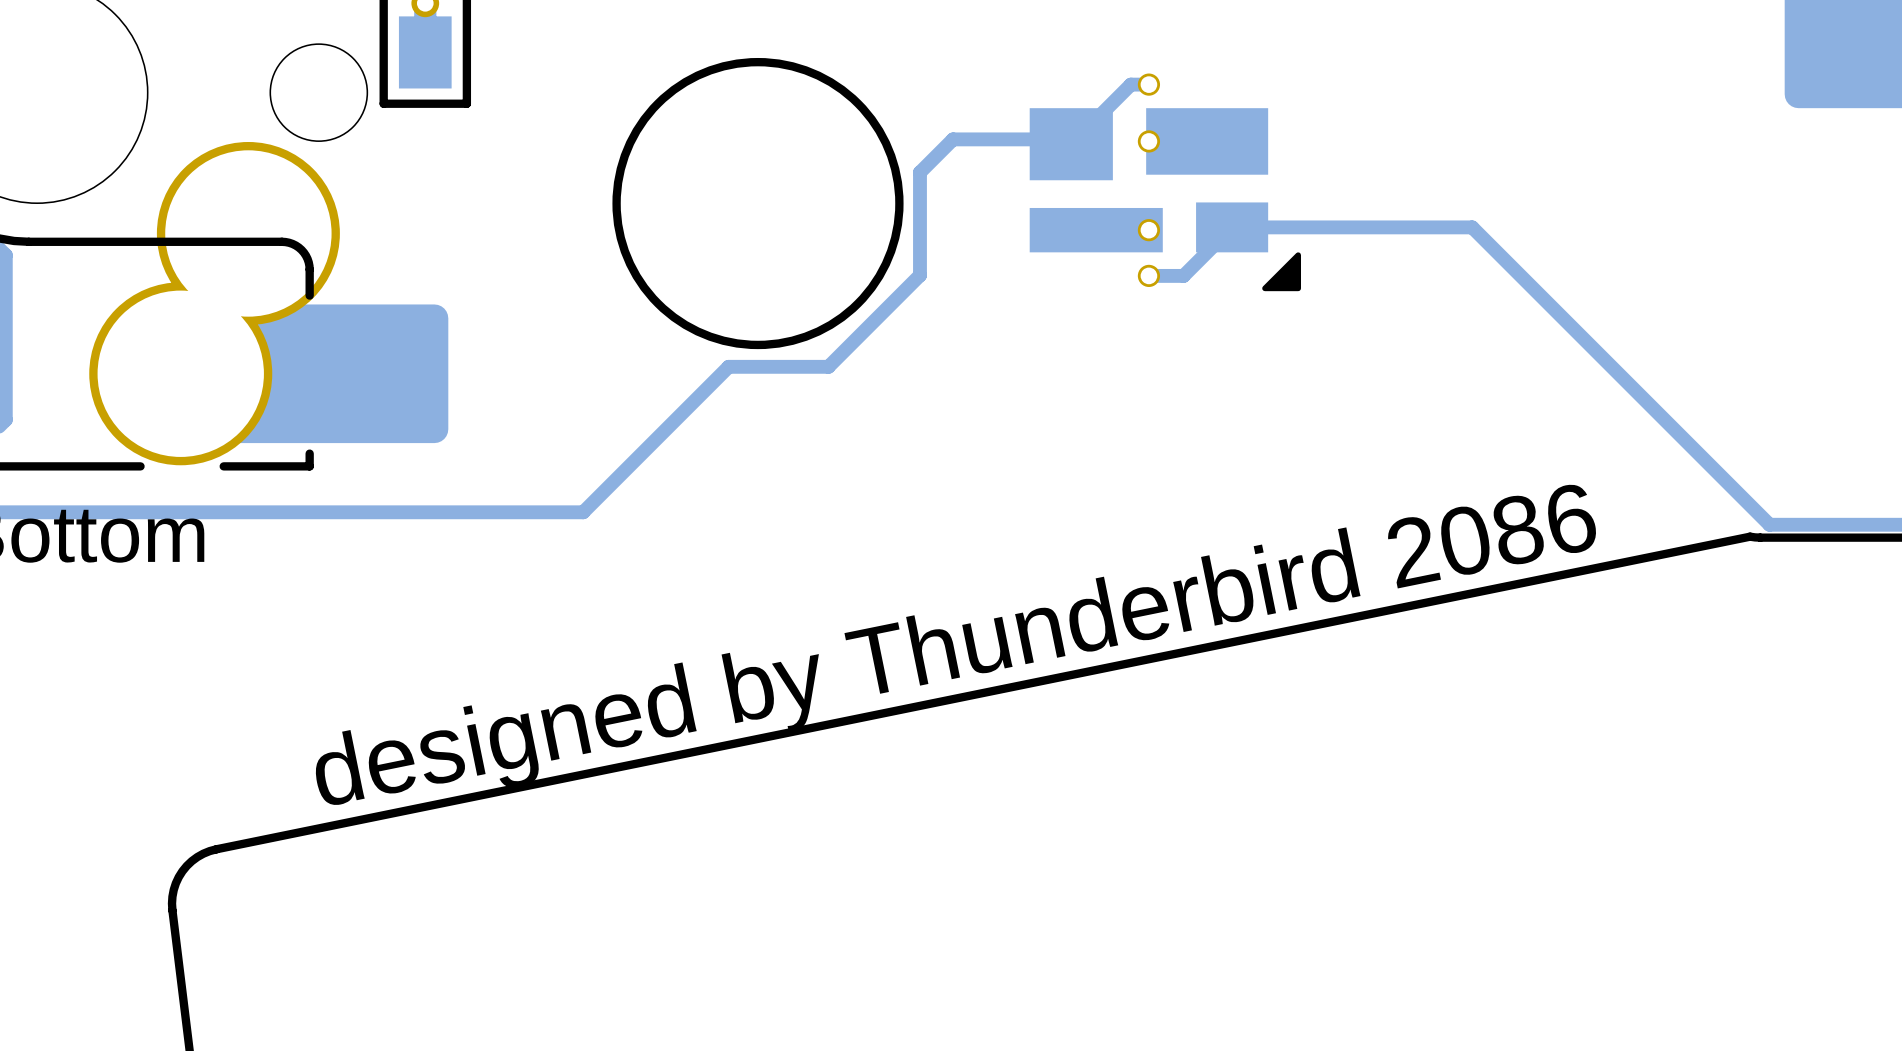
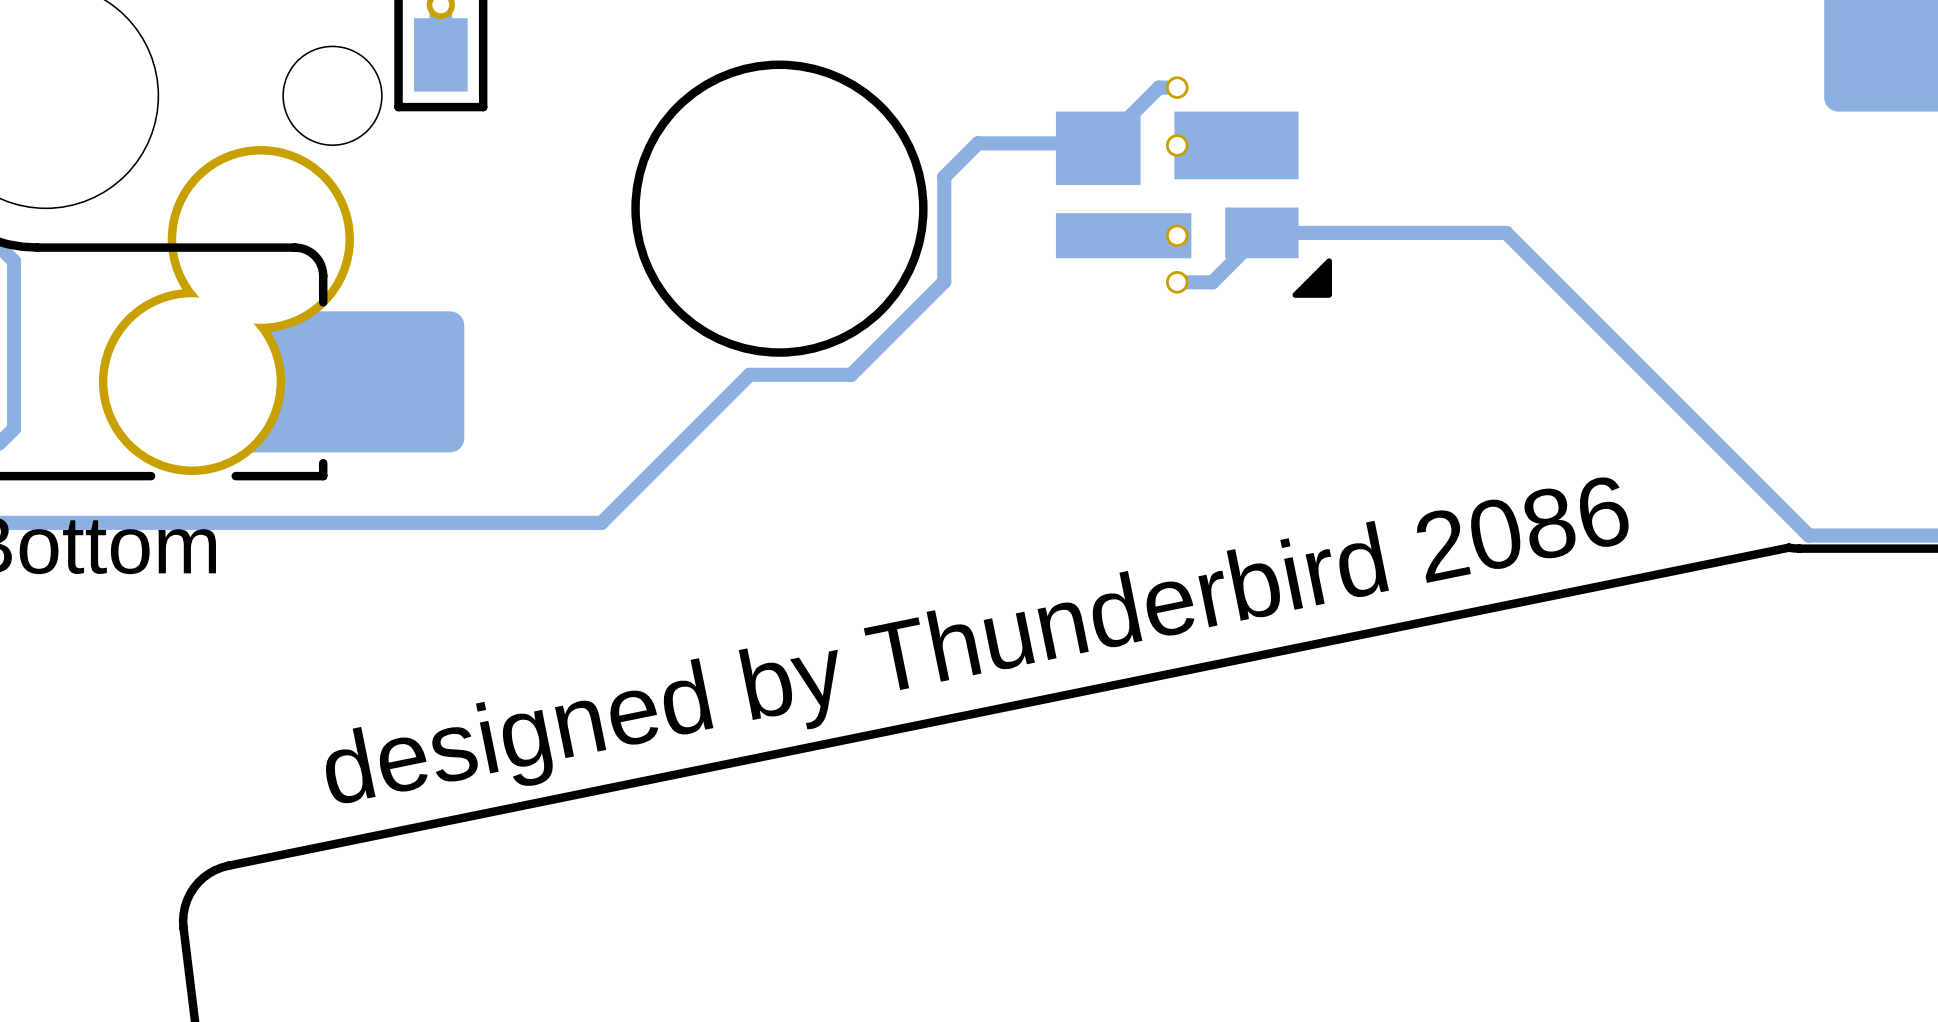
text position: designed by Thunderbird 2086 (954, 644) -> designed by Thunderbird 2086 (975, 639)

